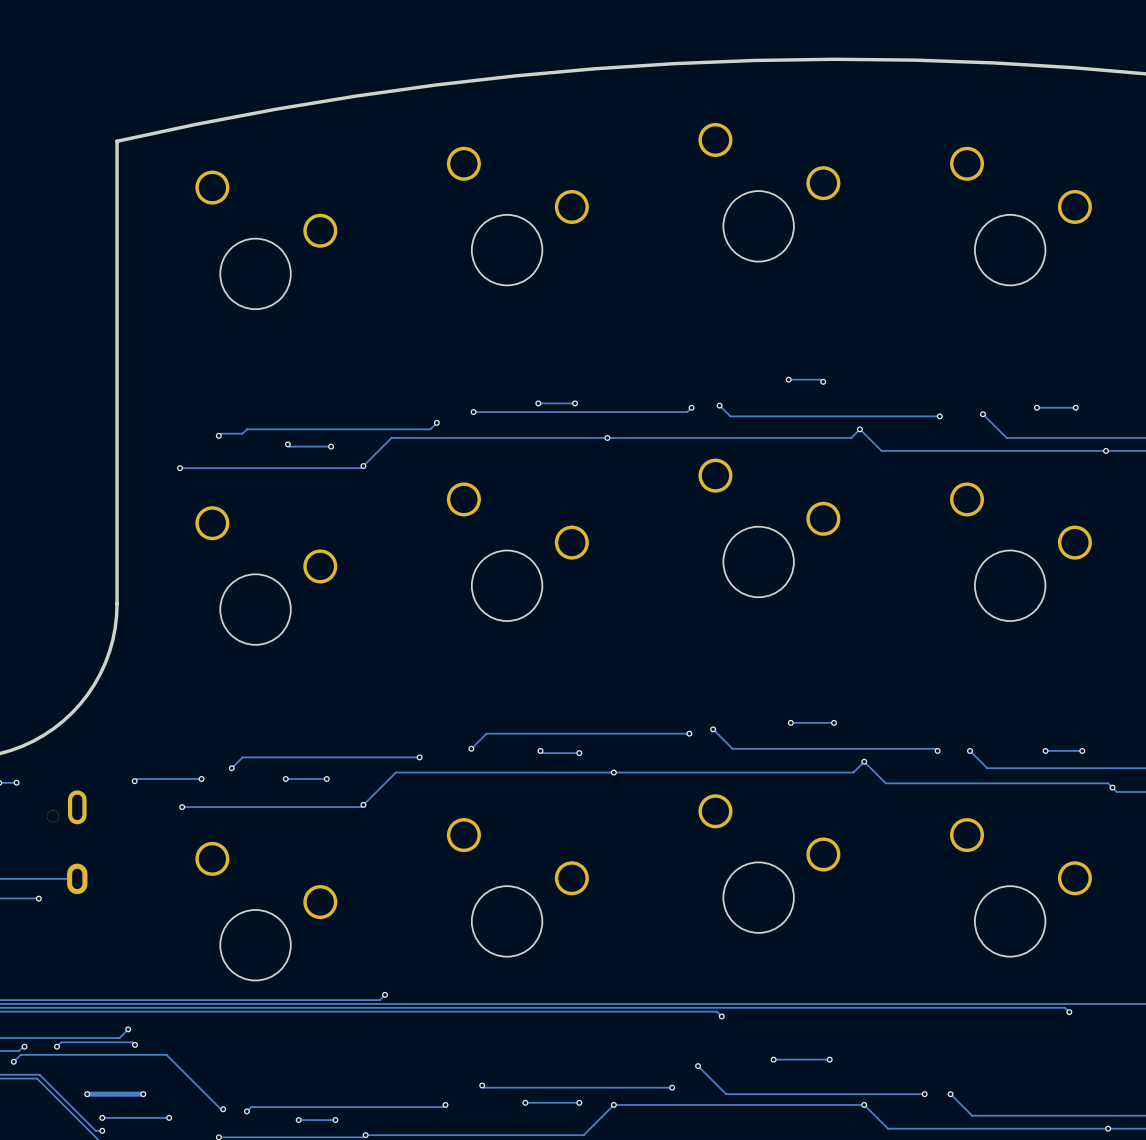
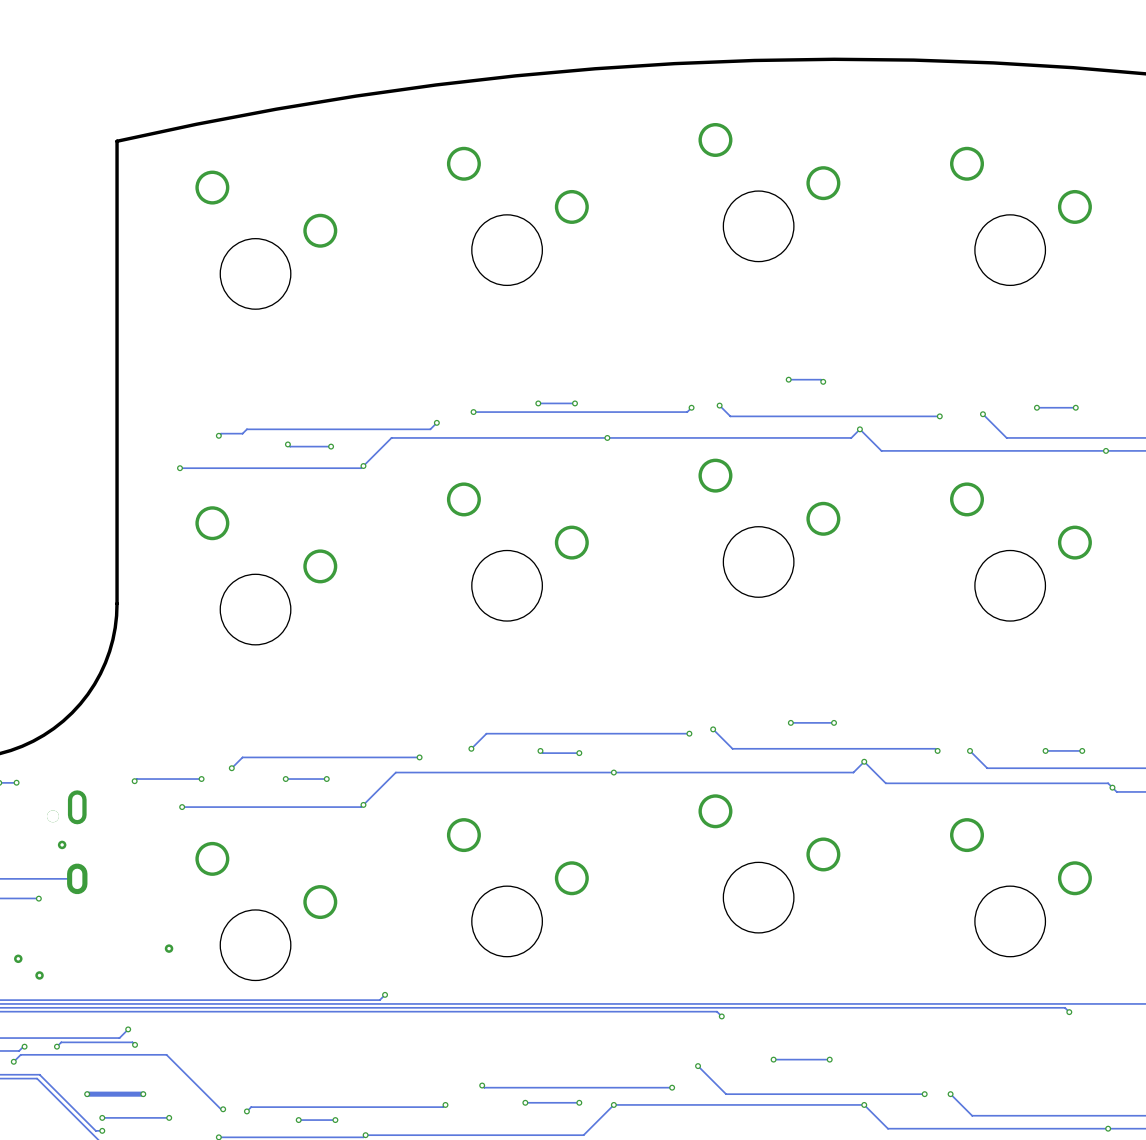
via: none -> (62, 844)
via: none -> (169, 948)
via: none -> (18, 958)
via: none -> (39, 975)

